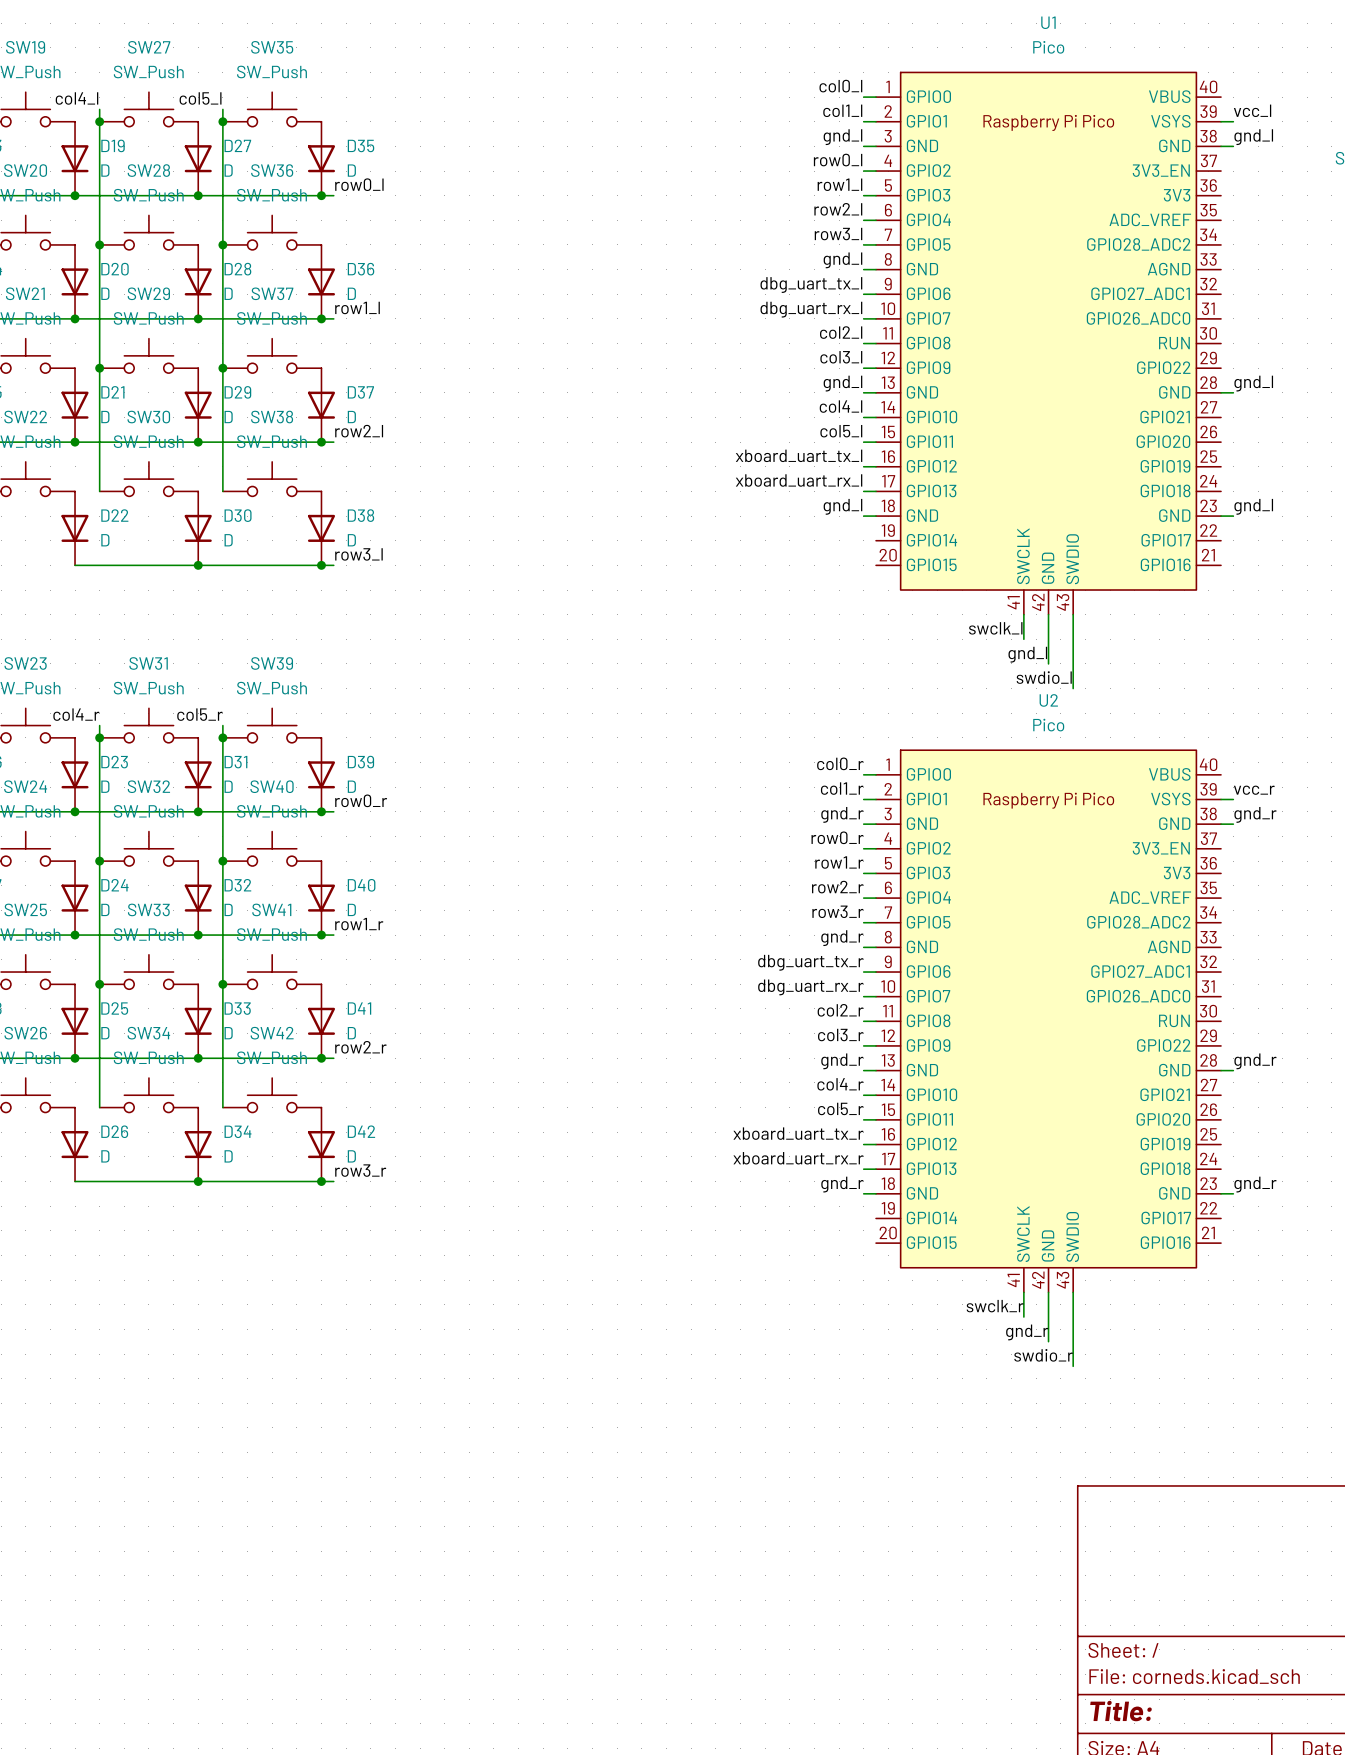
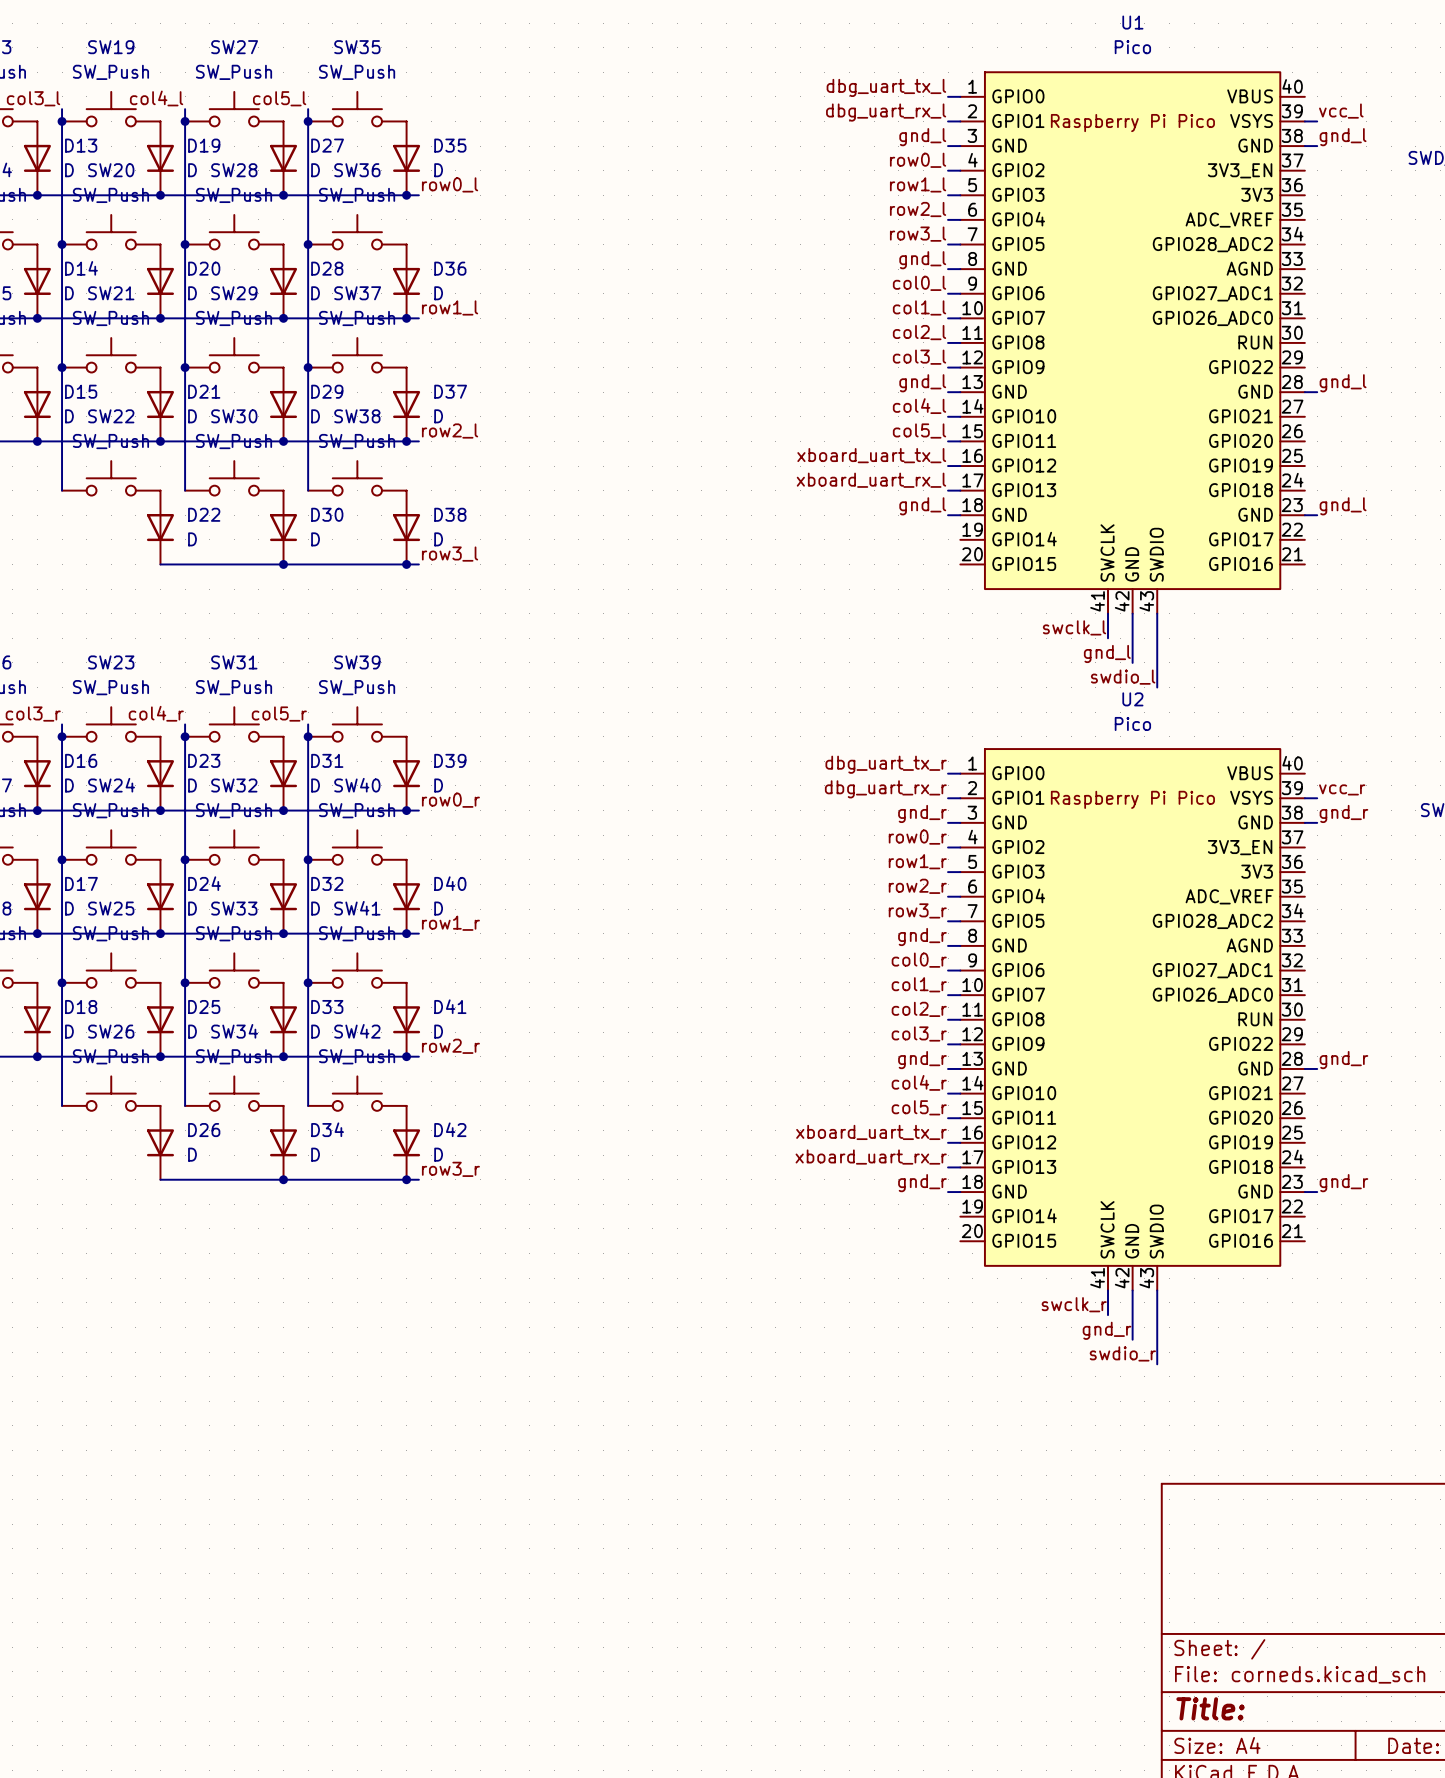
label: col0_l (840, 86) -> dbg_uart_tx_l (886, 87)
label: col1_l (842, 110) -> dbg_uart_rx_l (886, 112)
label: dbg_uart_tx_l (811, 285) -> col0_l (919, 283)
label: dbg_uart_rx_l (811, 309) -> col1_l (919, 307)
label: col0_r (840, 763) -> dbg_uart_tx_r (886, 764)
label: col1_r (842, 788) -> dbg_uart_rx_r (885, 789)
label: dbg_uart_tx_r (810, 962) -> col0_r (919, 960)
label: dbg_uart_rx_r (810, 987) -> col1_r (919, 984)

